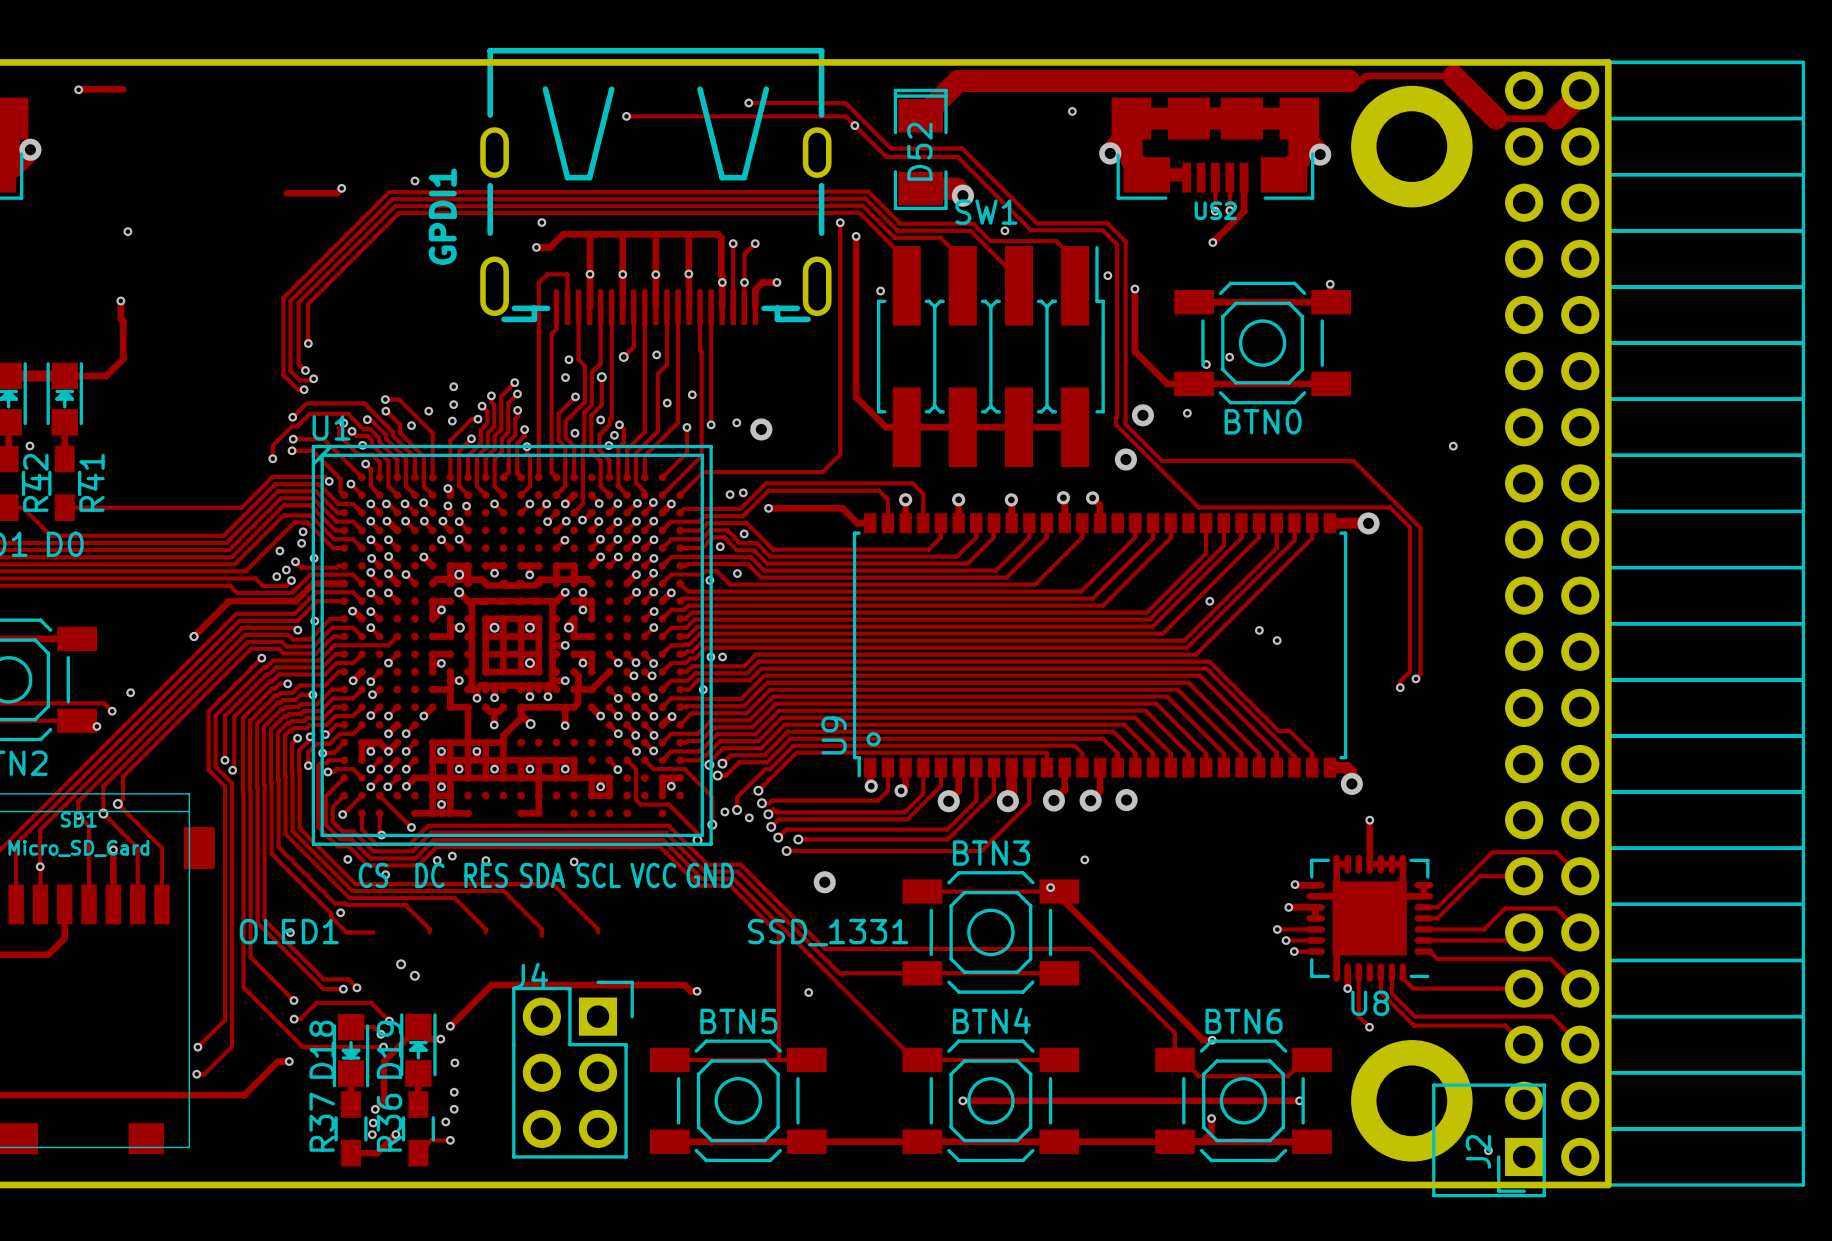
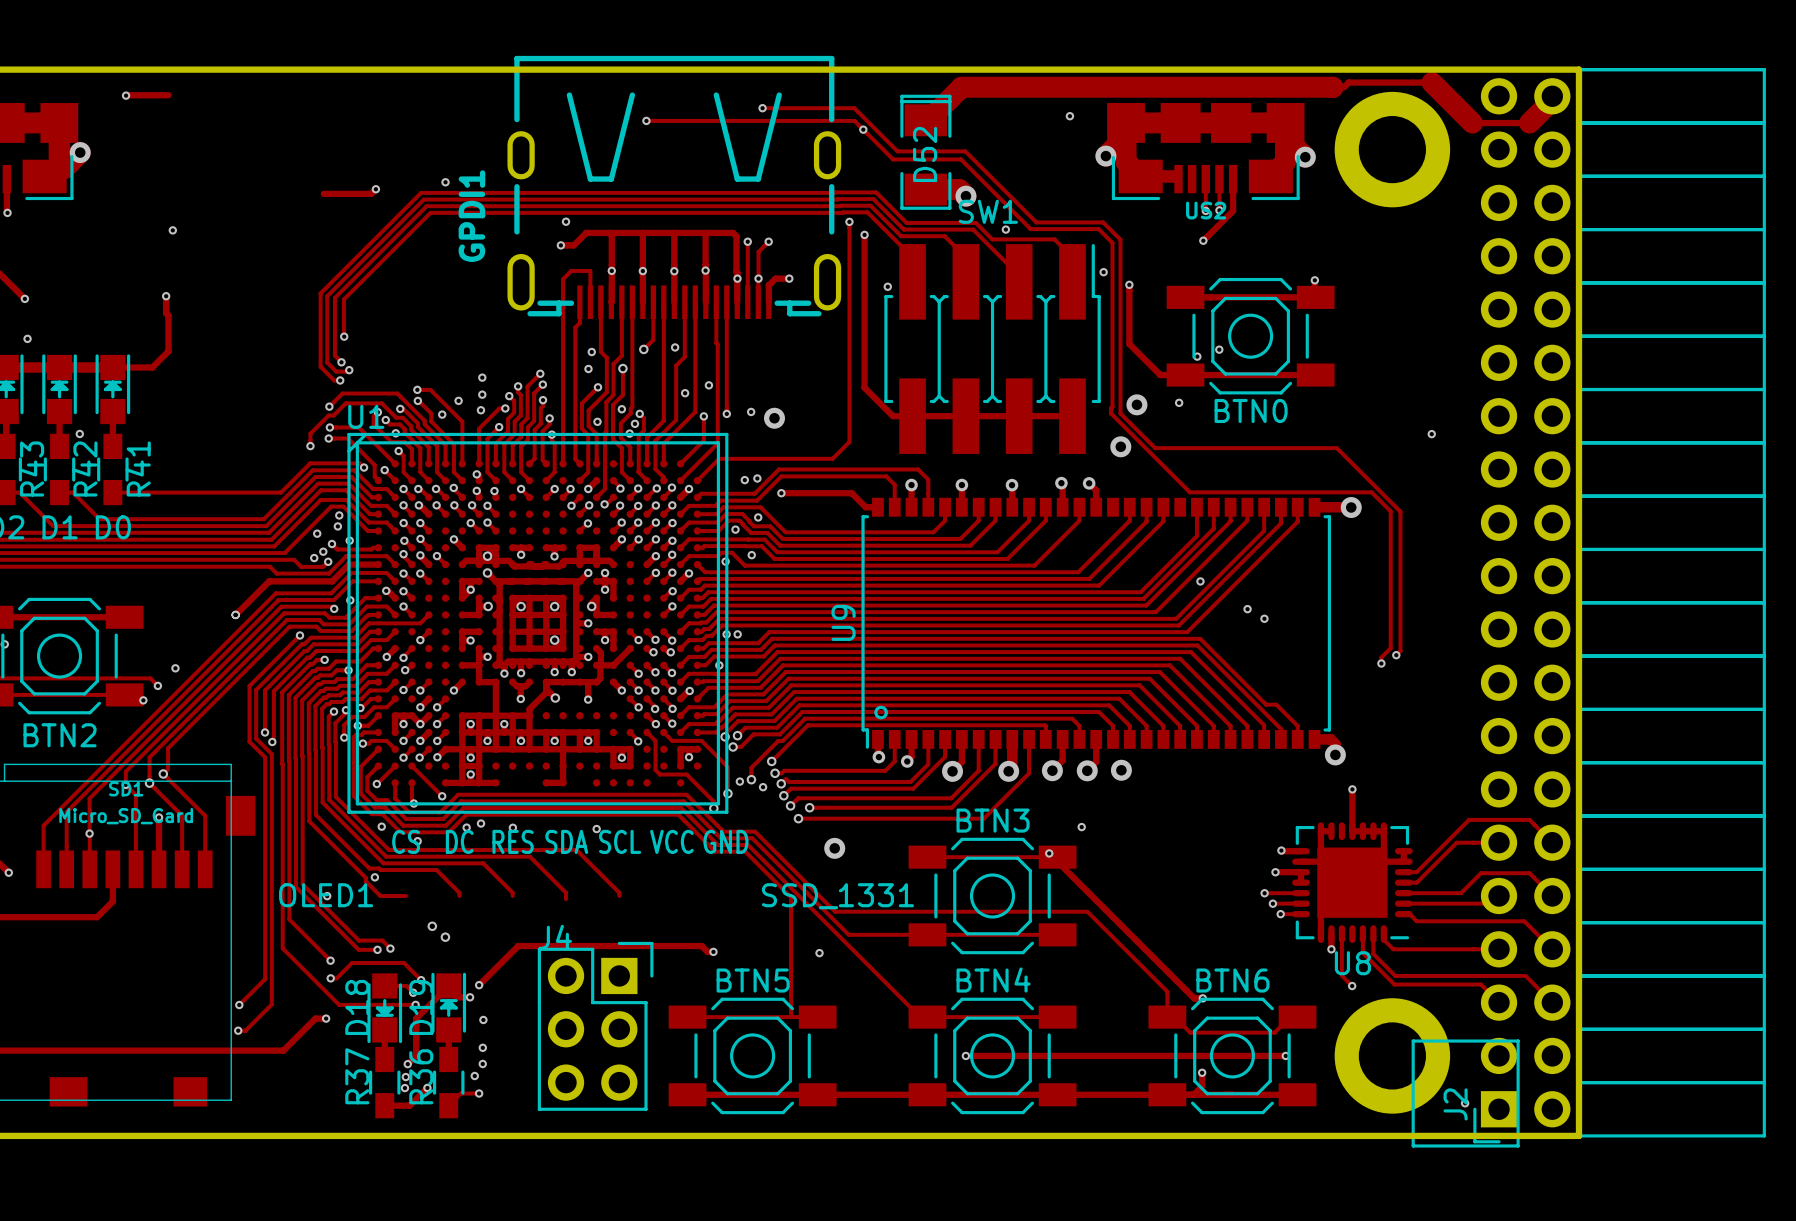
U9 name position: U9 (834, 735) -> U9 (843, 622)

